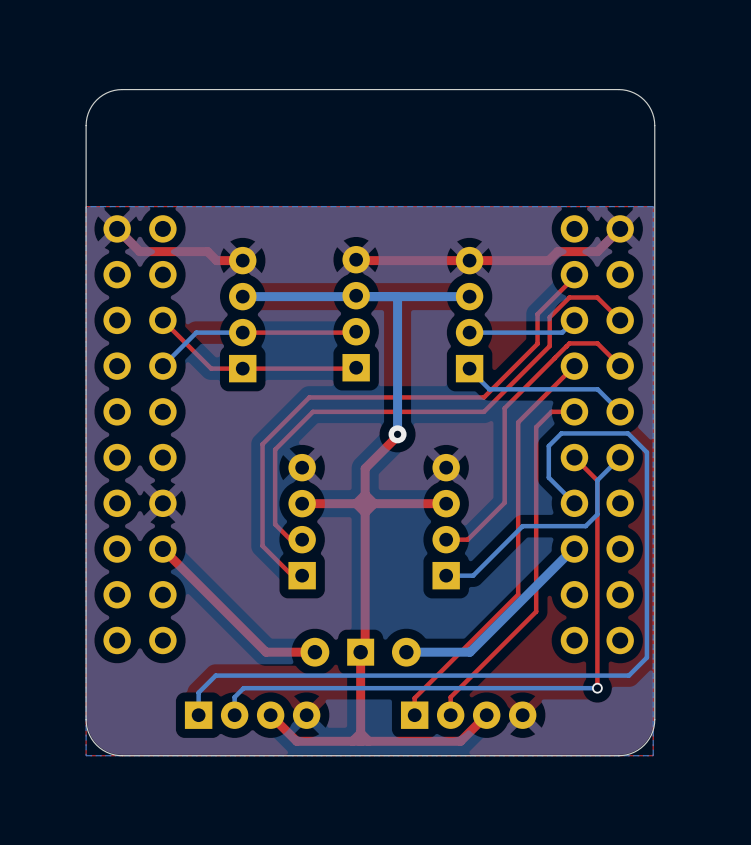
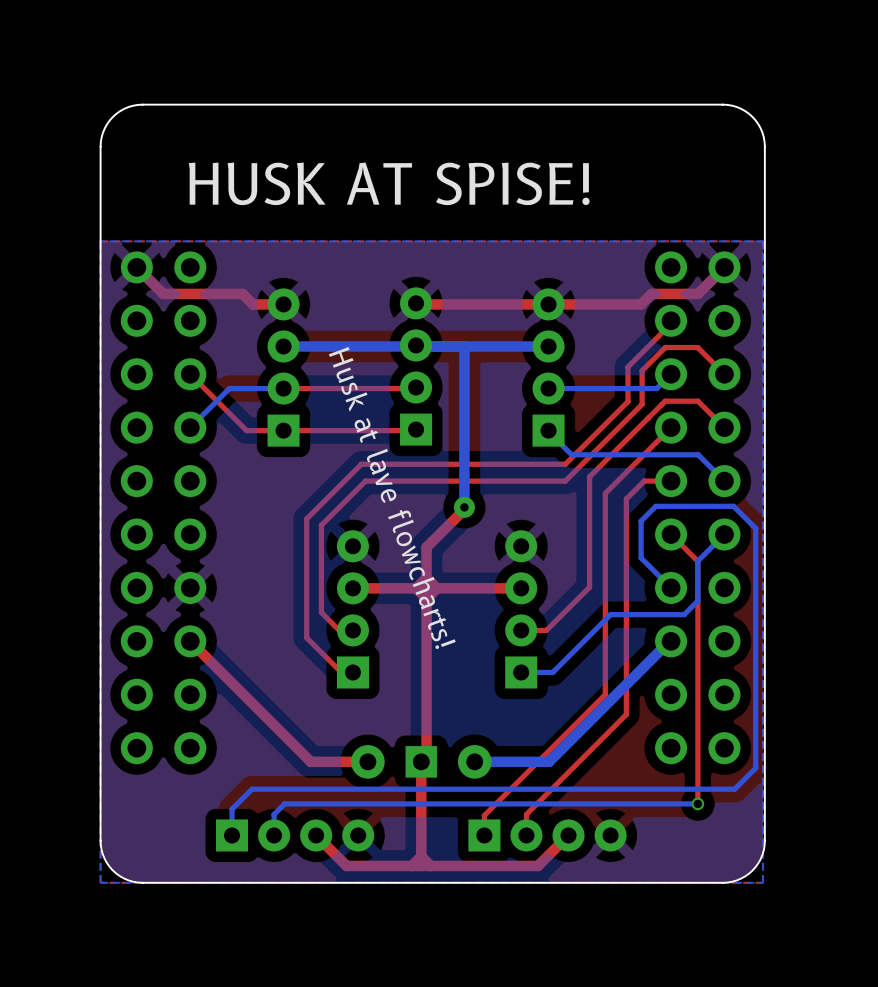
text: none -> HUSK AT SPISE! (389, 183)
text: none -> Husk at lave flowcharts! (392, 497)

